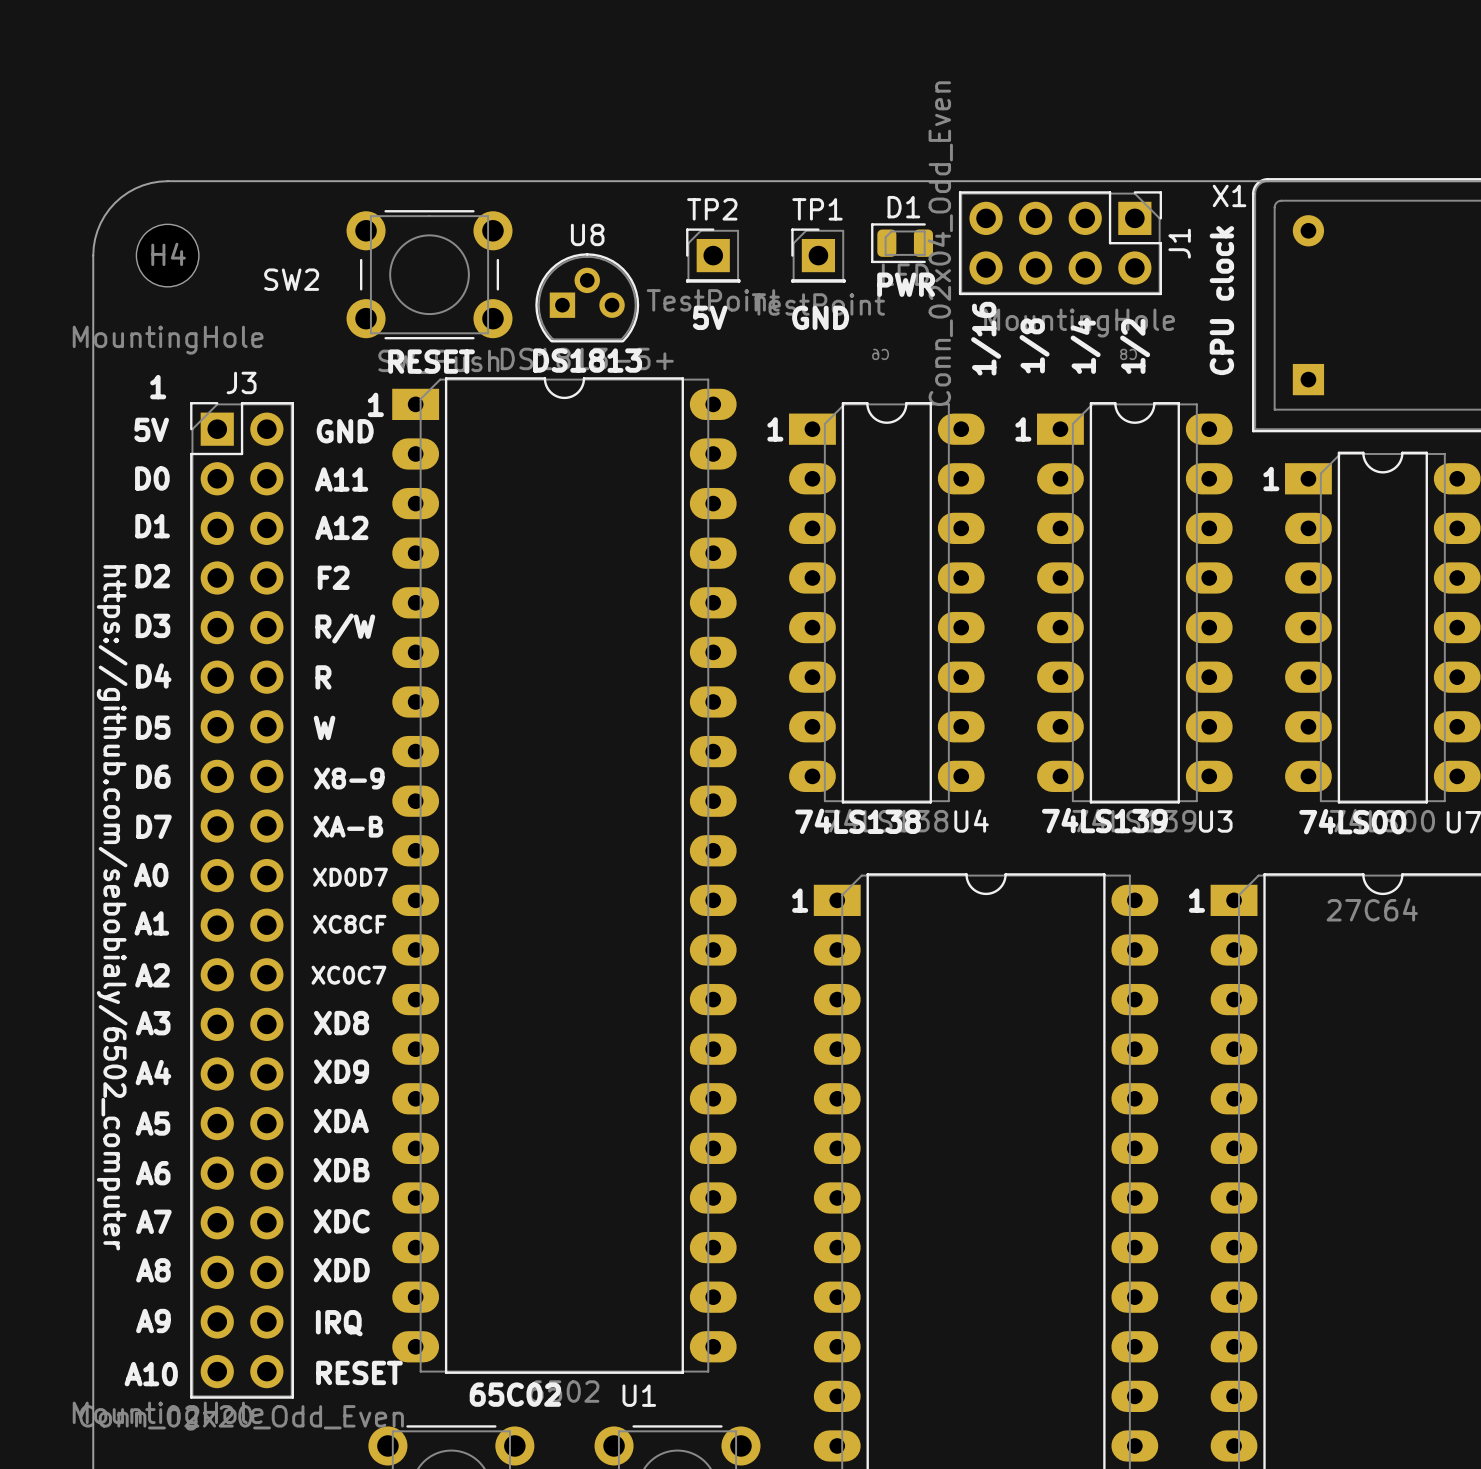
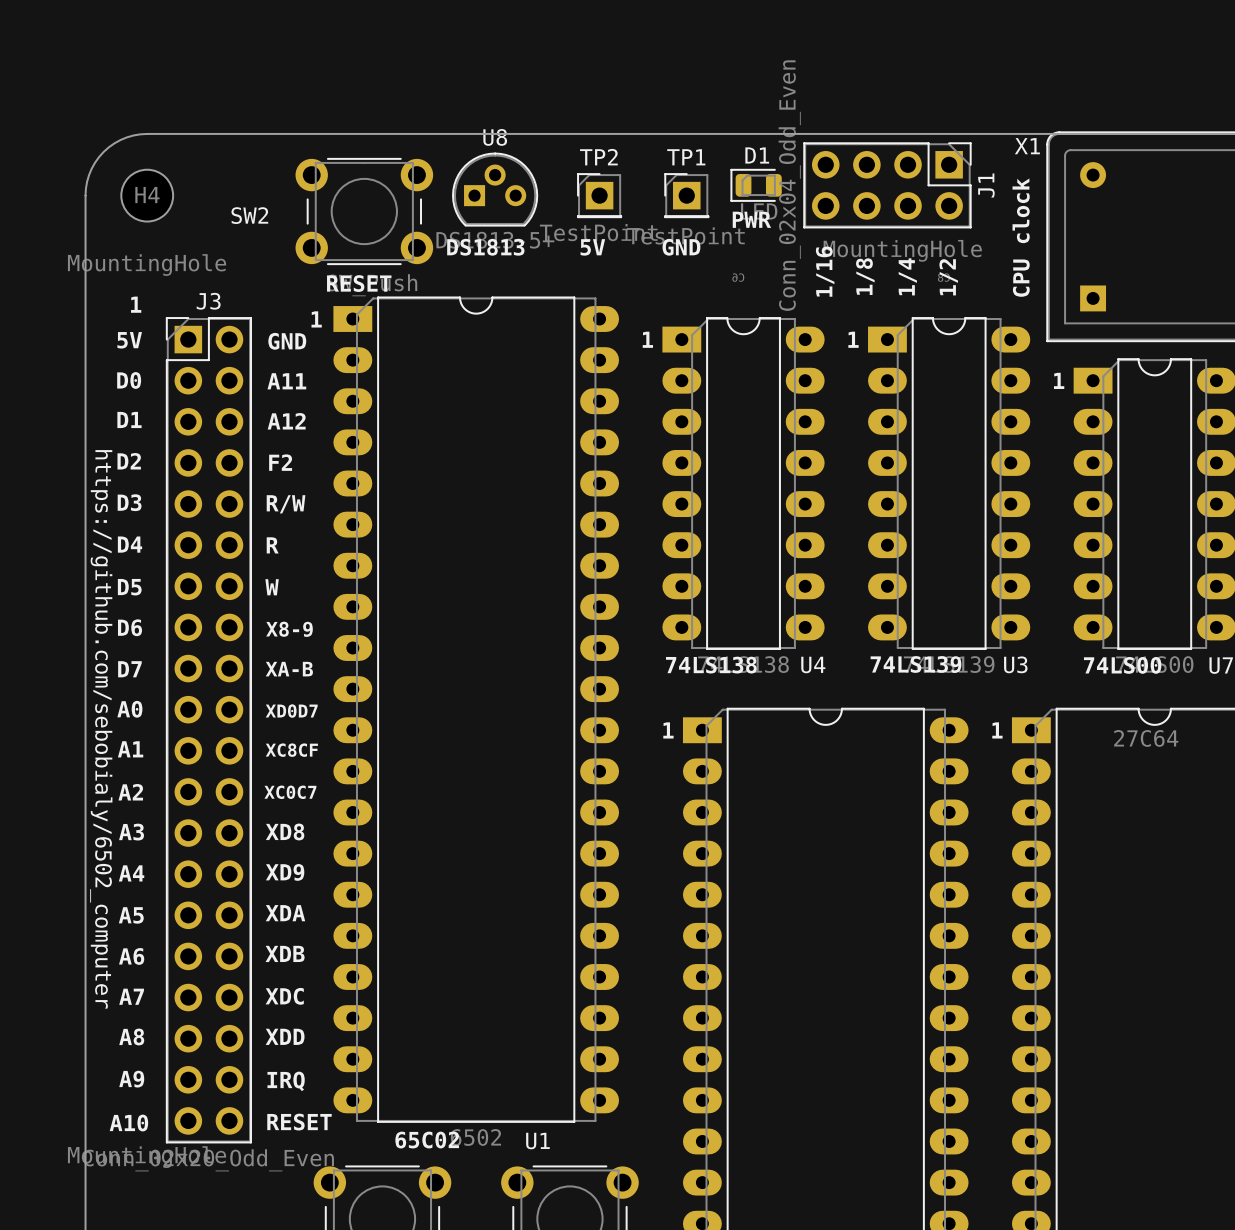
U8 position: (587, 297) -> (495, 189)
text position: DS1813 (587, 360) -> DS1813 (485, 247)

